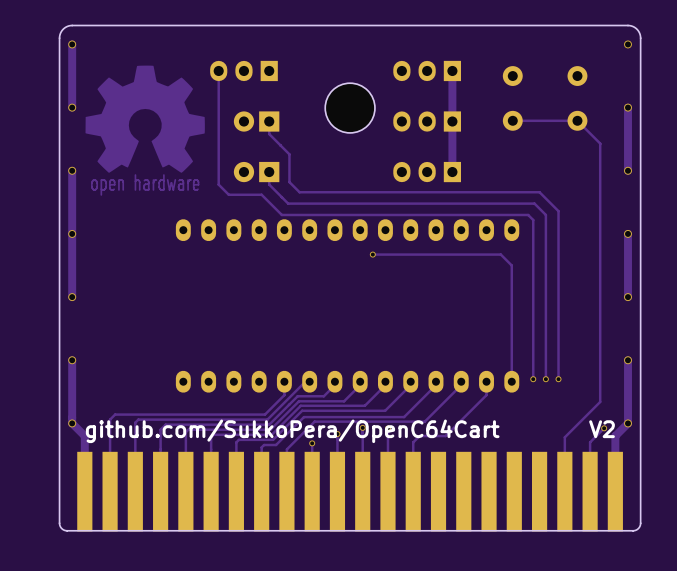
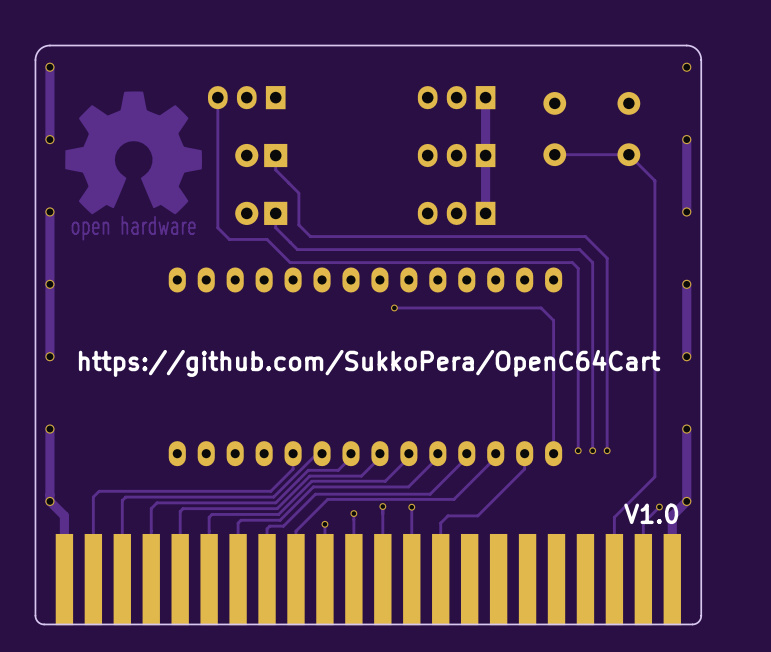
part: (350, 108) -> none
text: none -> https://github.com/SukkoPera/OpenC64Cart (369, 363)
text: V2 (602, 429) -> V1.0 (651, 513)
text: github.com/SukkoPera/OpenC64Cart (292, 431) -> none

